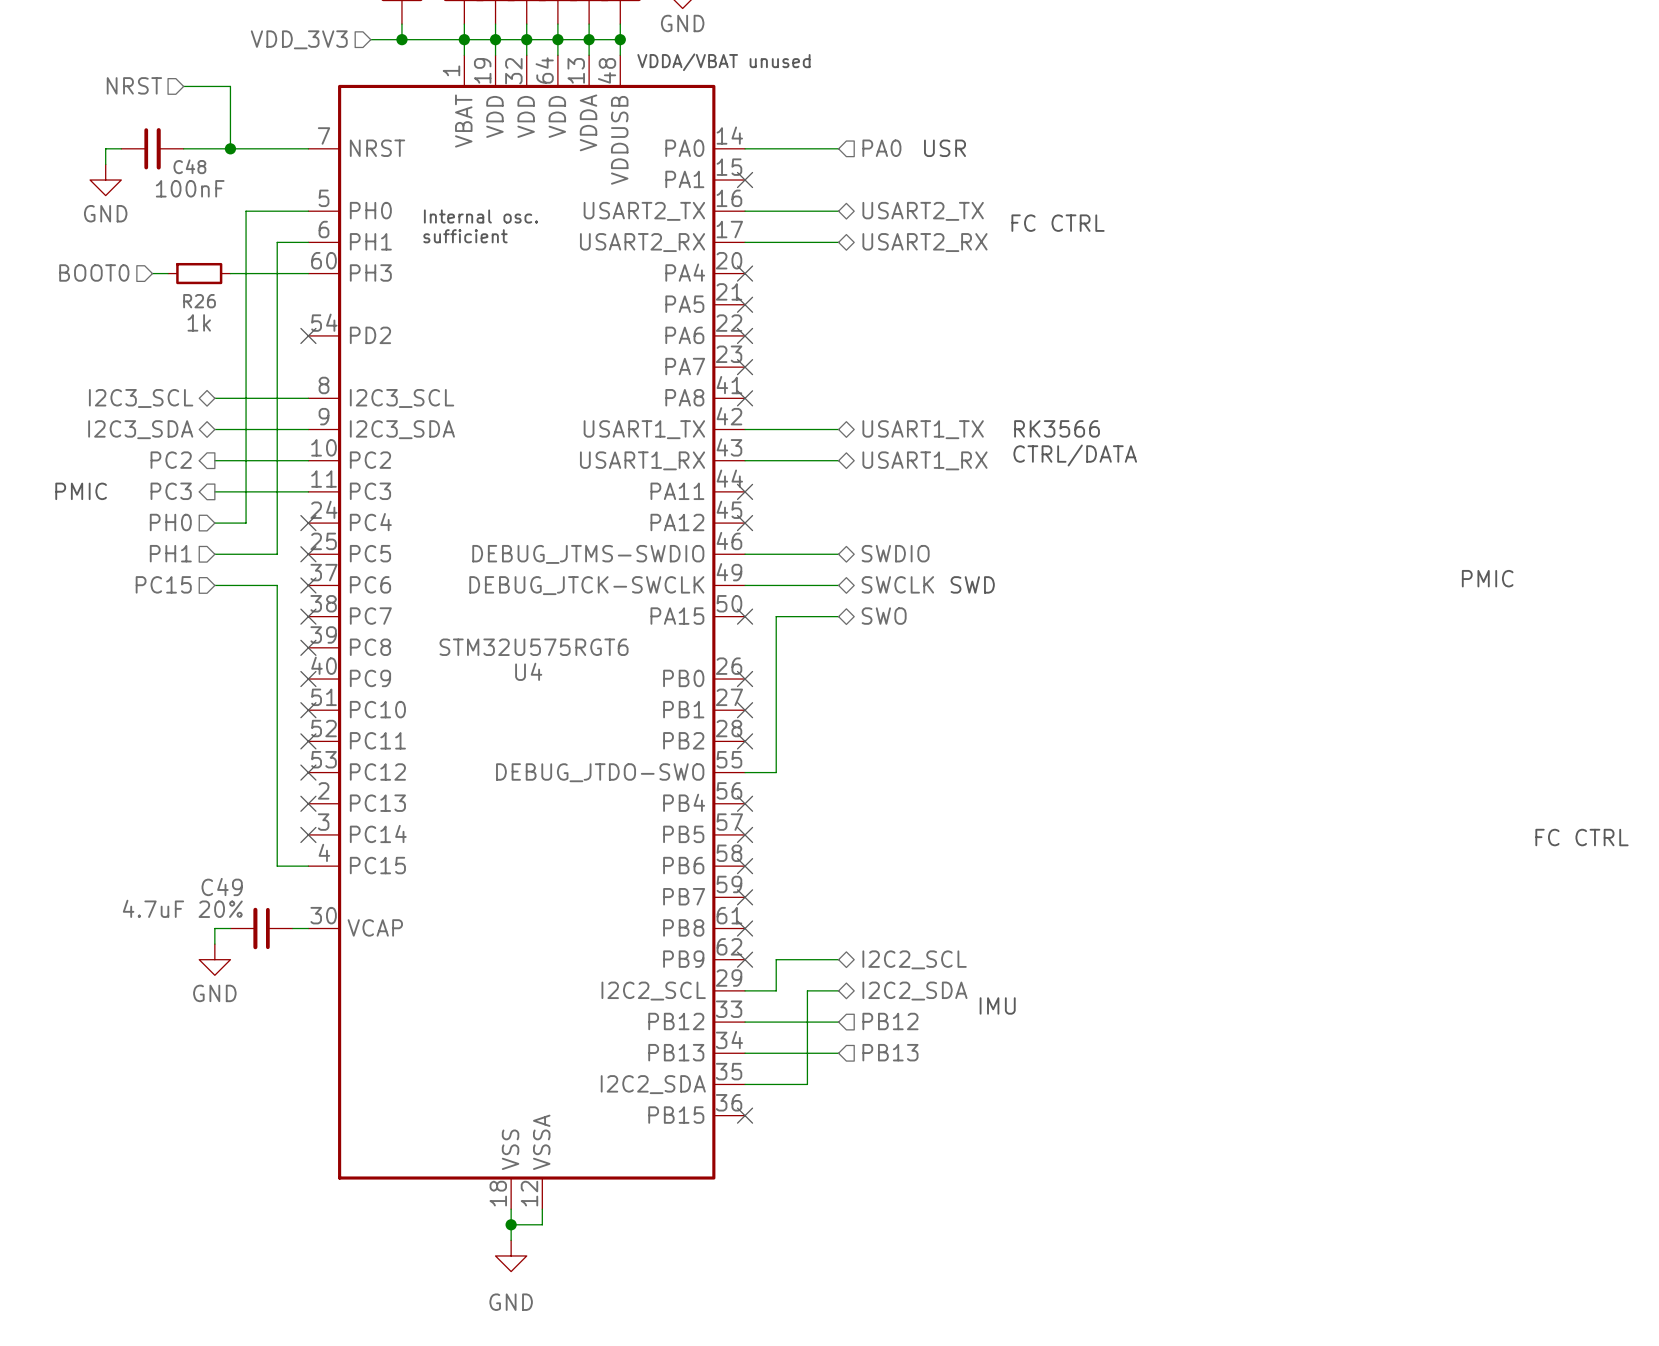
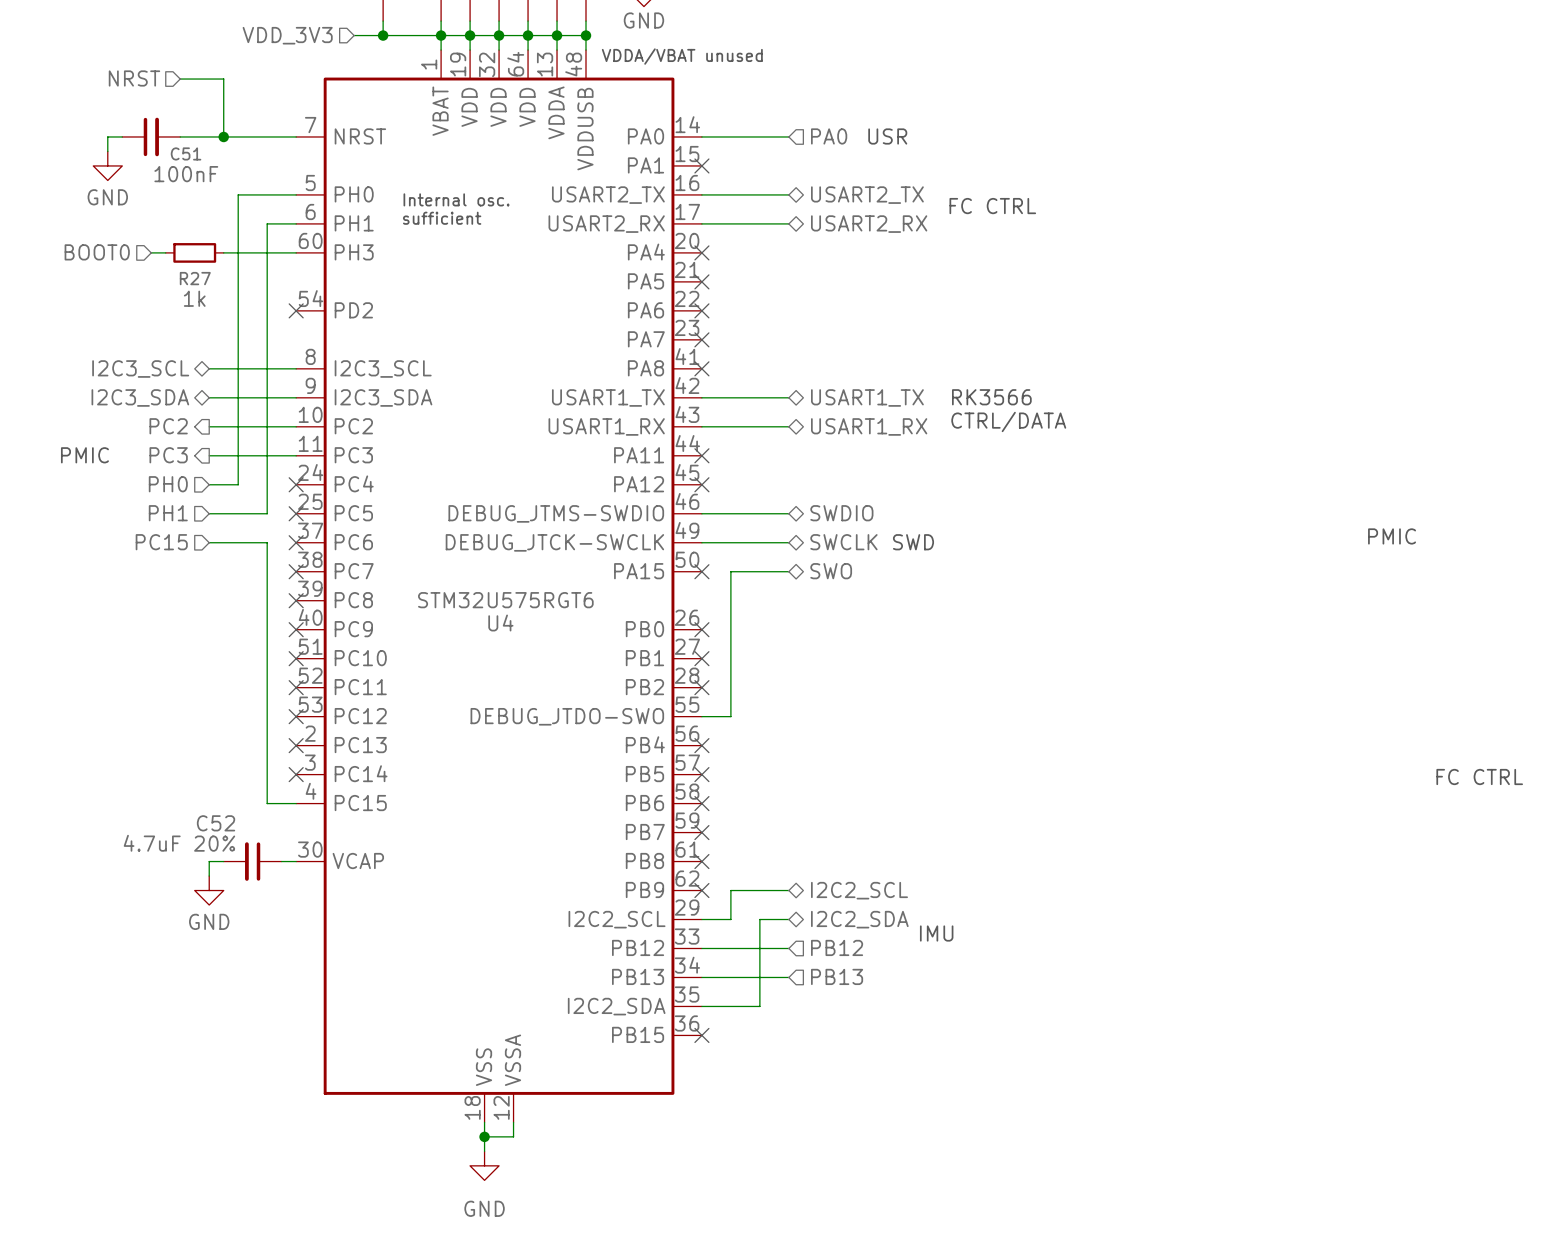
C48 name: C48 (189, 166) -> C51 (186, 153)
R26 name: R26 (199, 301) -> R27 (195, 278)
C49 name: C49 (222, 887) -> C52 (216, 823)

